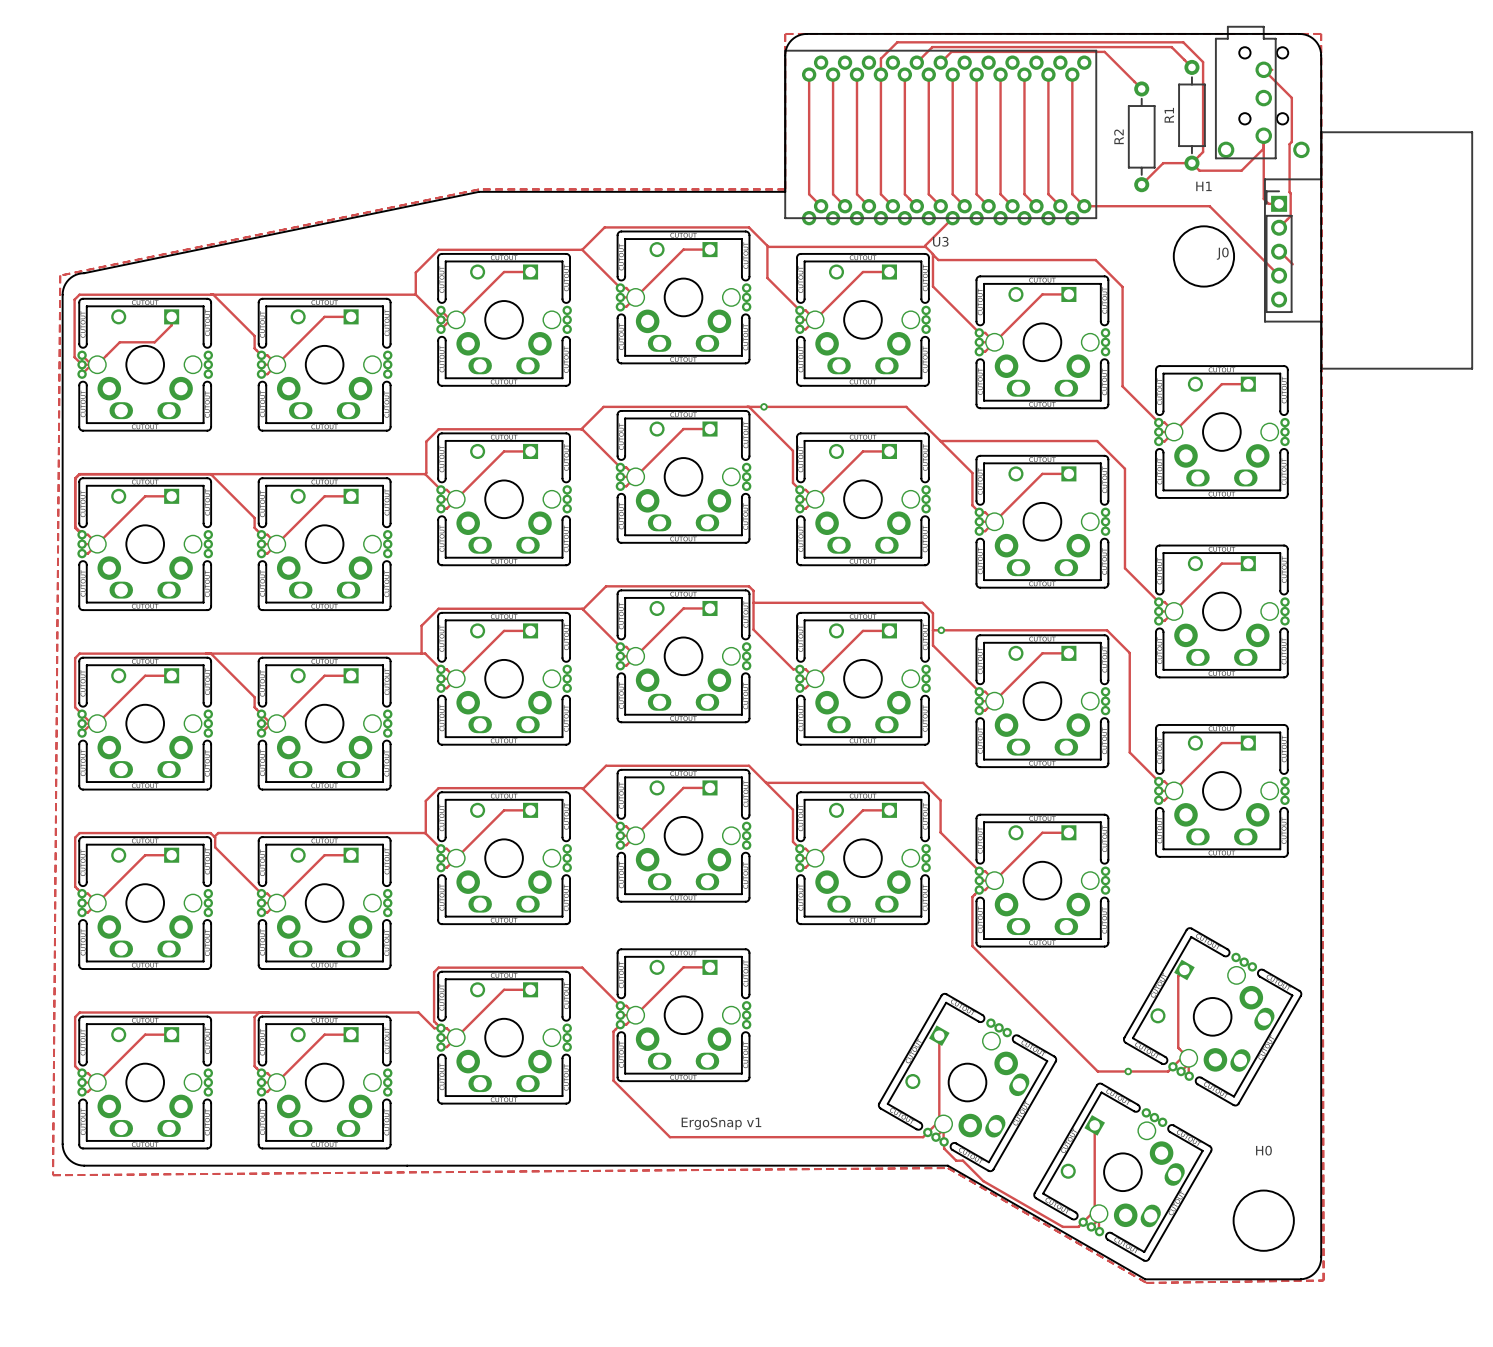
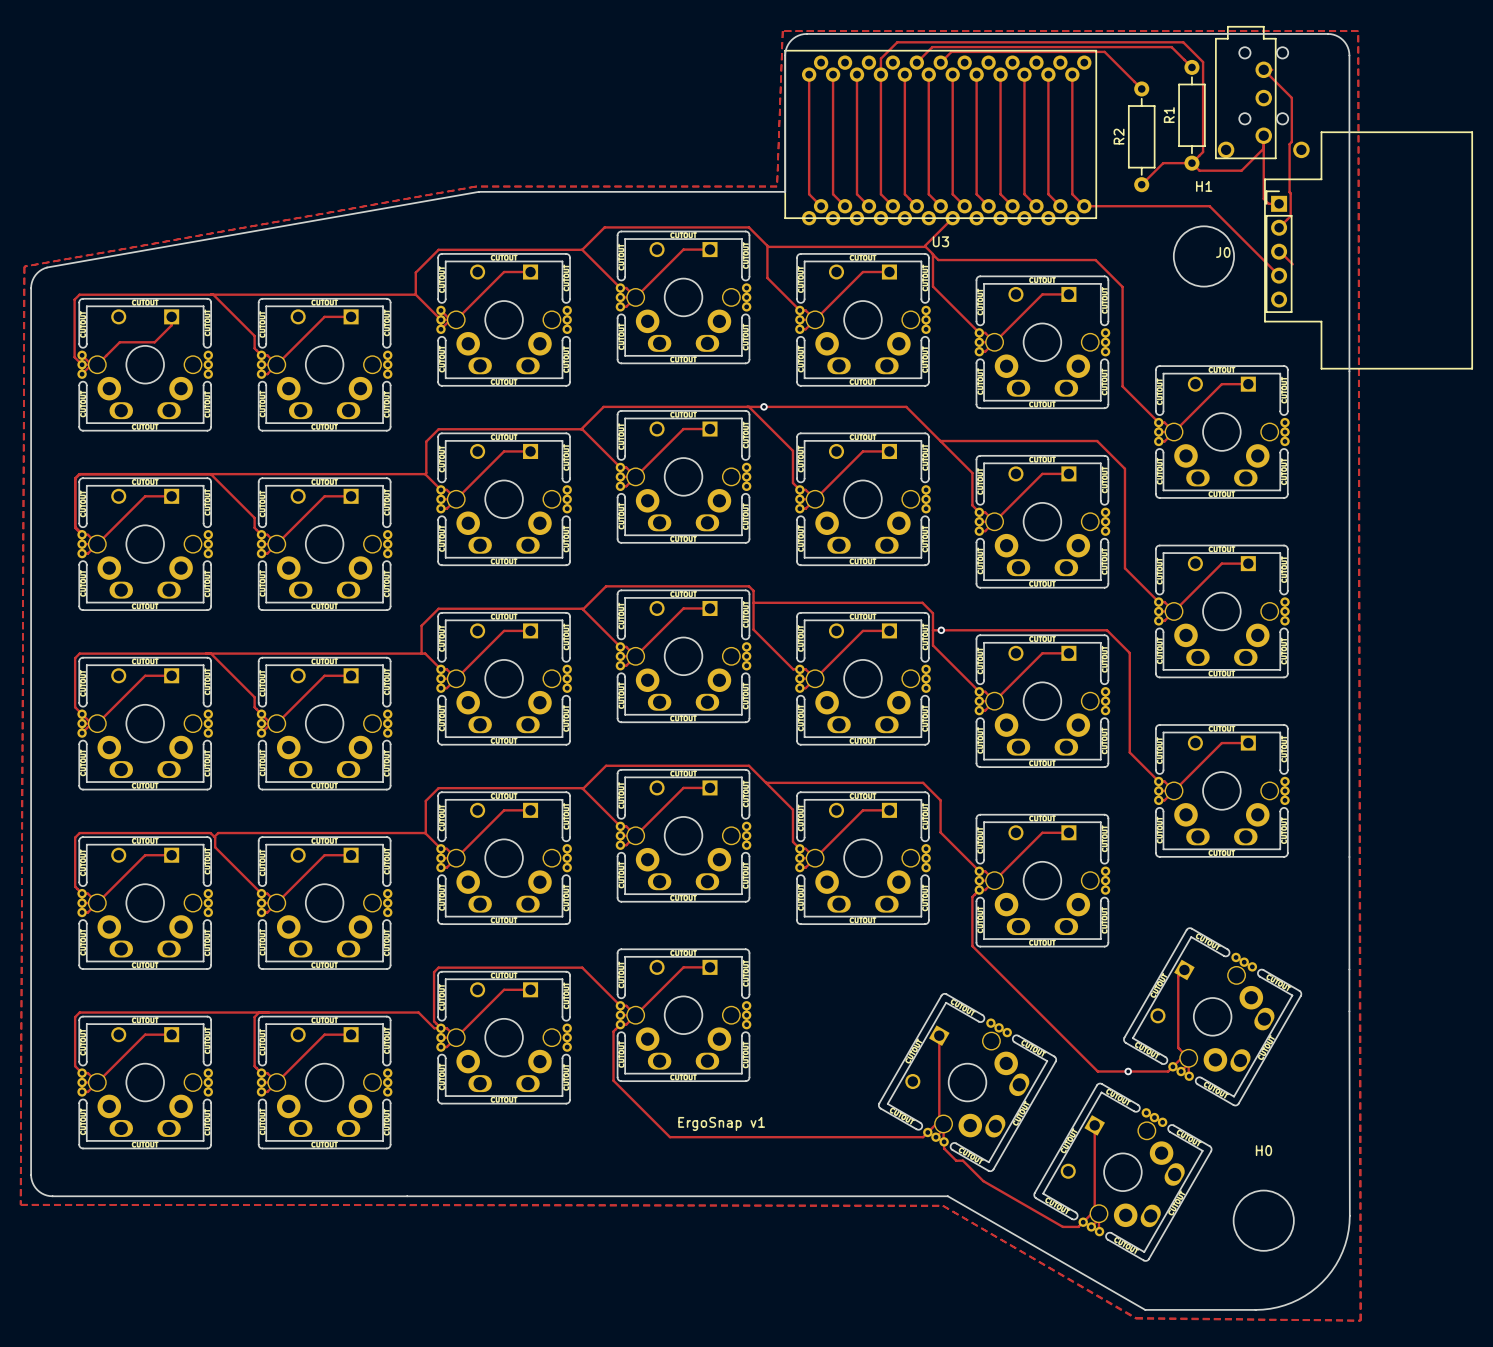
zone outline: none -> (1358, 31) (782, 31) (777, 186) (475, 186) (24, 266)
zone outline: none -> (1358, 31) (1361, 1320) (1135, 1317) (942, 1205)
zone outline: none -> (1358, 31) (1360, 1320) (1135, 1318) (942, 1205)
zone outline: (785, 33) (1321, 33) (1323, 1280) (1146, 1282) (947, 1168) (53, 1175) (60, 275) (478, 189) (785, 189) (785, 33) -> none
board edge: (1299, 33) (1307, 35) (1314, 40) (1319, 47) (1321, 55) (1321, 1259) (1315, 1272) (1303, 1278) (1145, 1279) (947, 1165) (84, 1165) (75, 1164) (67, 1157) (62, 1144) (62, 294) (64, 286) (71, 277) (78, 273) (478, 191) -> (1299, 33) (1336, 35) (1346, 44) (1349, 55) (1349, 1215) (1348, 1230) (1342, 1251) (1327, 1276) (1310, 1291) (1298, 1299) (1270, 1308) (1145, 1309) (947, 1196) (52, 1196) (44, 1194) (35, 1187) (31, 1174) (31, 288) (32, 280) (39, 271) (47, 267) (478, 191)
zone outline: none -> (476, 186) (24, 266)
zone outline: none -> (24, 266) (20, 1204) (942, 1205)

